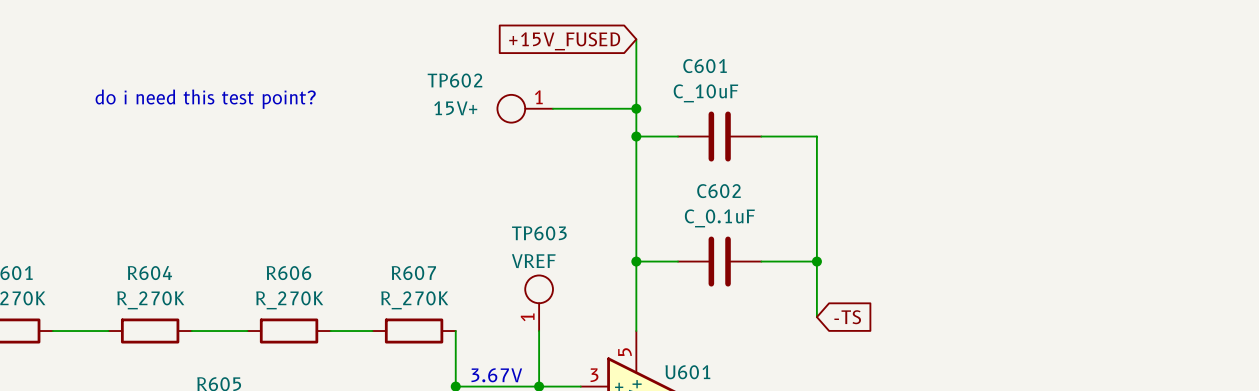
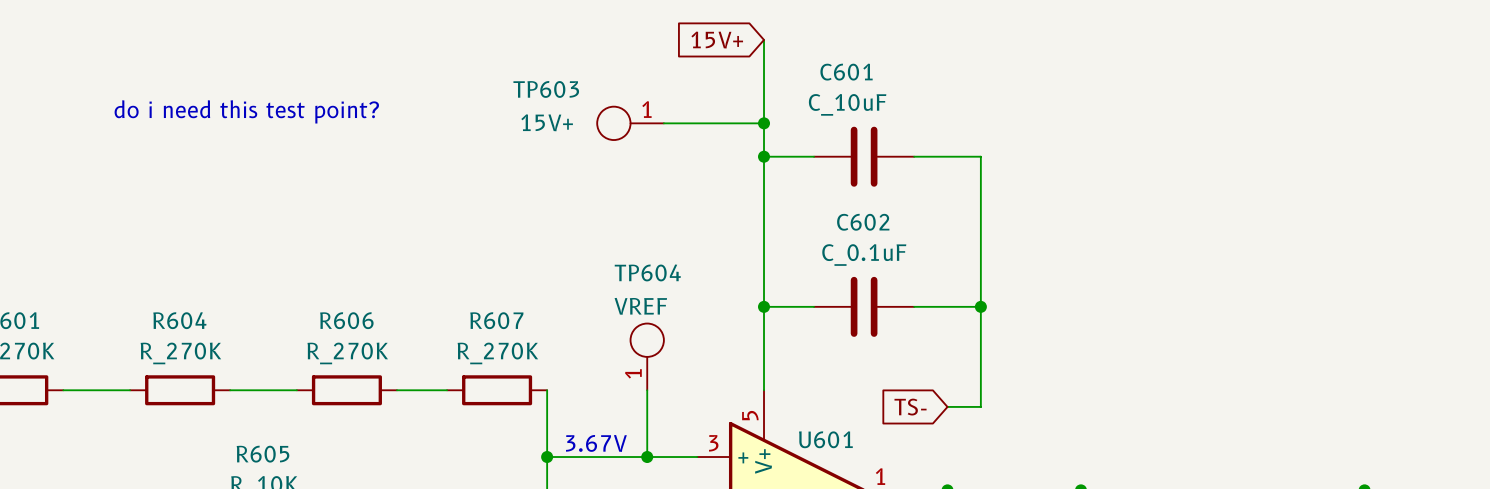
global label: +15V_FUSED (564, 41) -> 15V+ (717, 40)
TP602 name: TP602 (455, 80) -> TP603 (546, 89)
TP603 name: TP603 (539, 233) -> TP604 (647, 272)
wire: none -> (980, 373) (980, 406) (947, 406)
global label: -TS (847, 317) -> none
global label: none -> TS- (910, 407)

